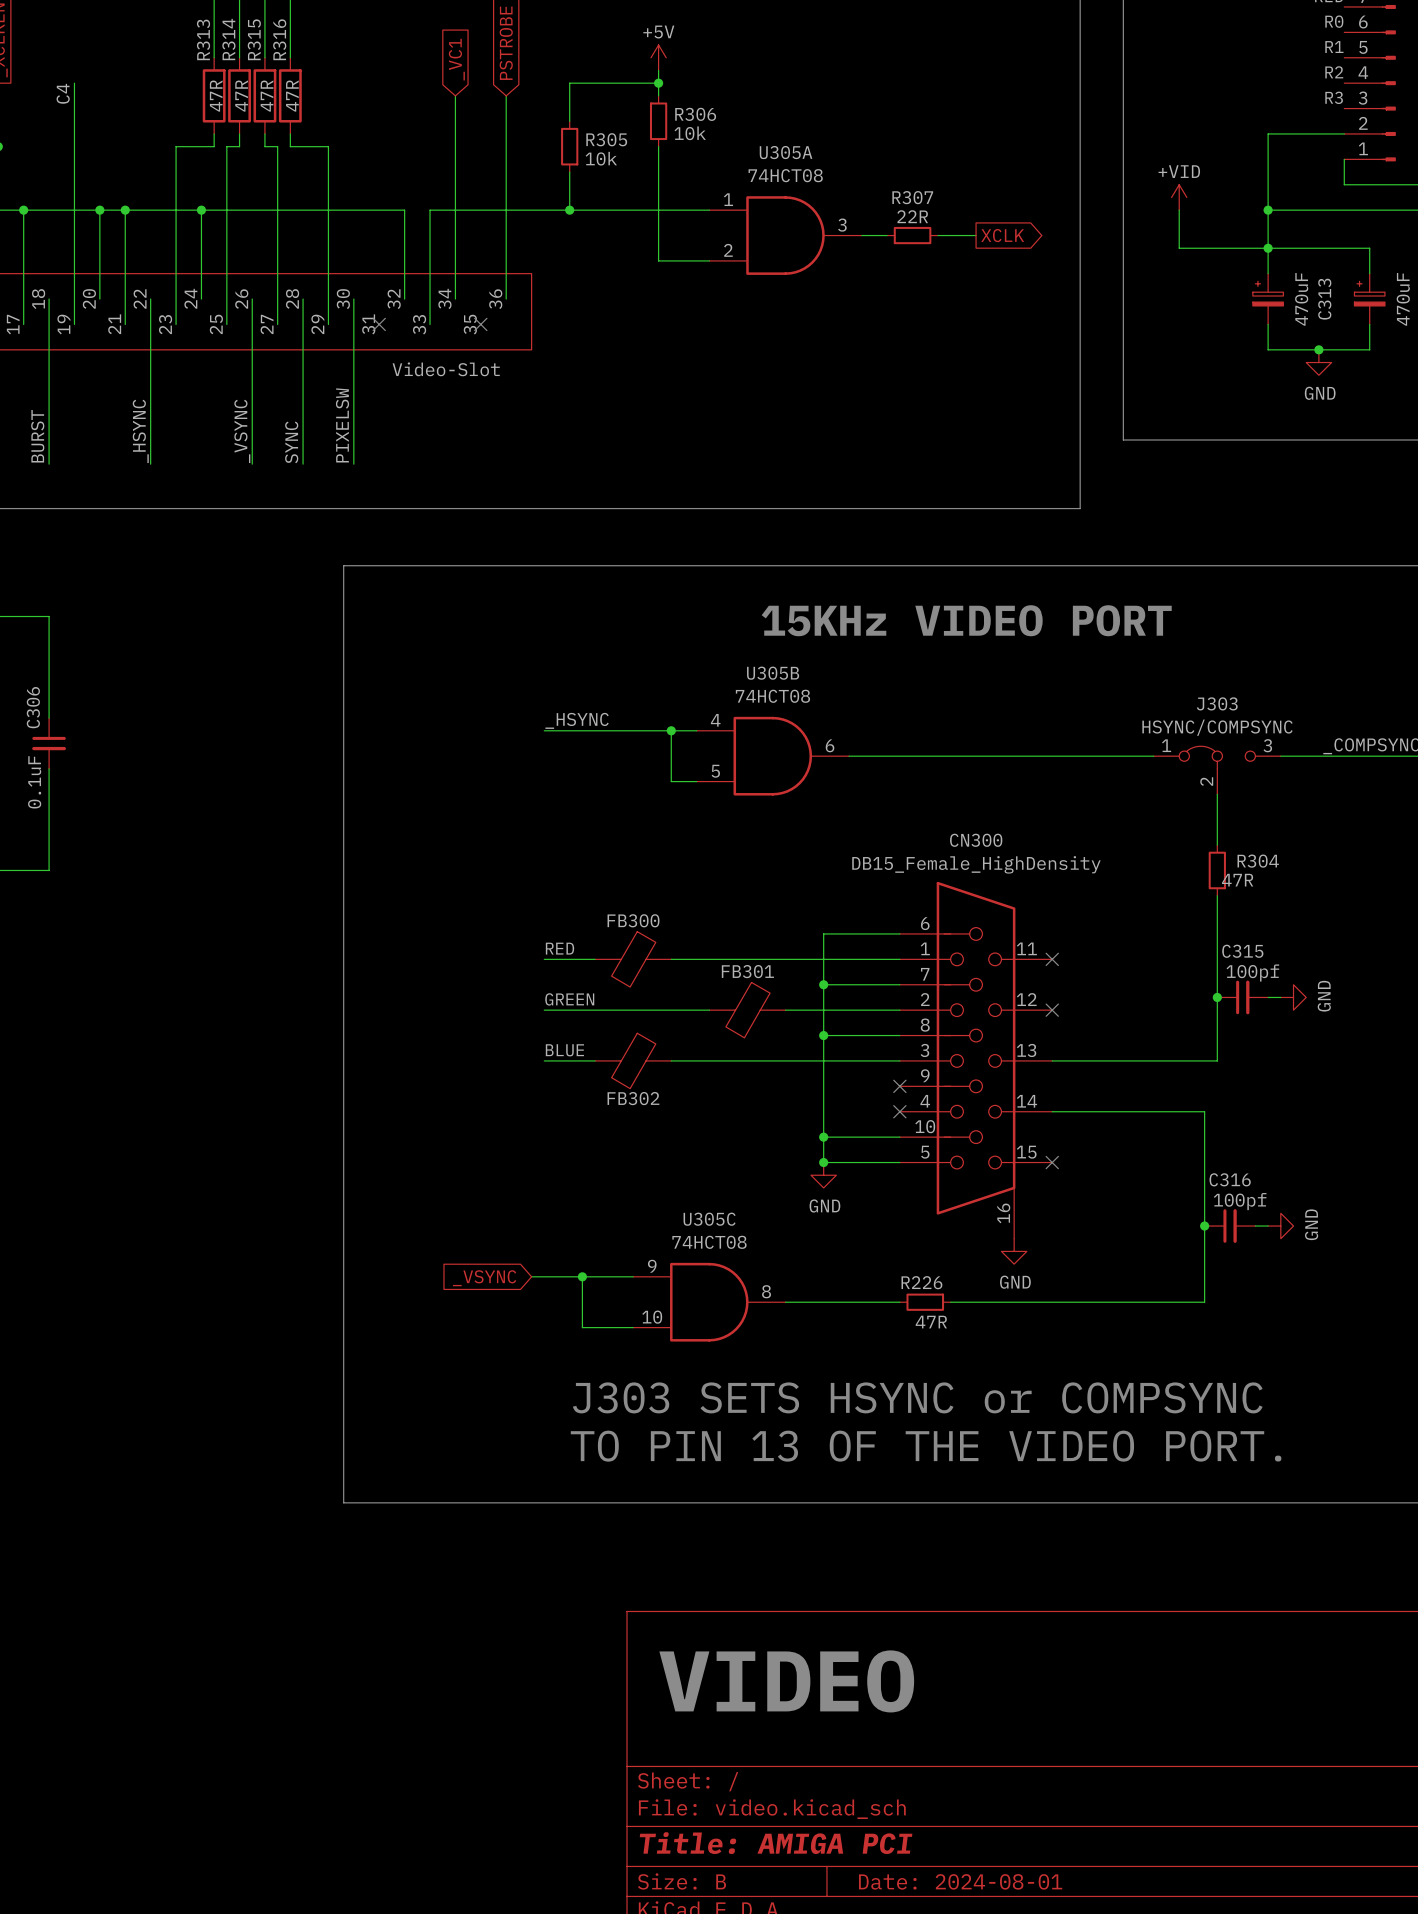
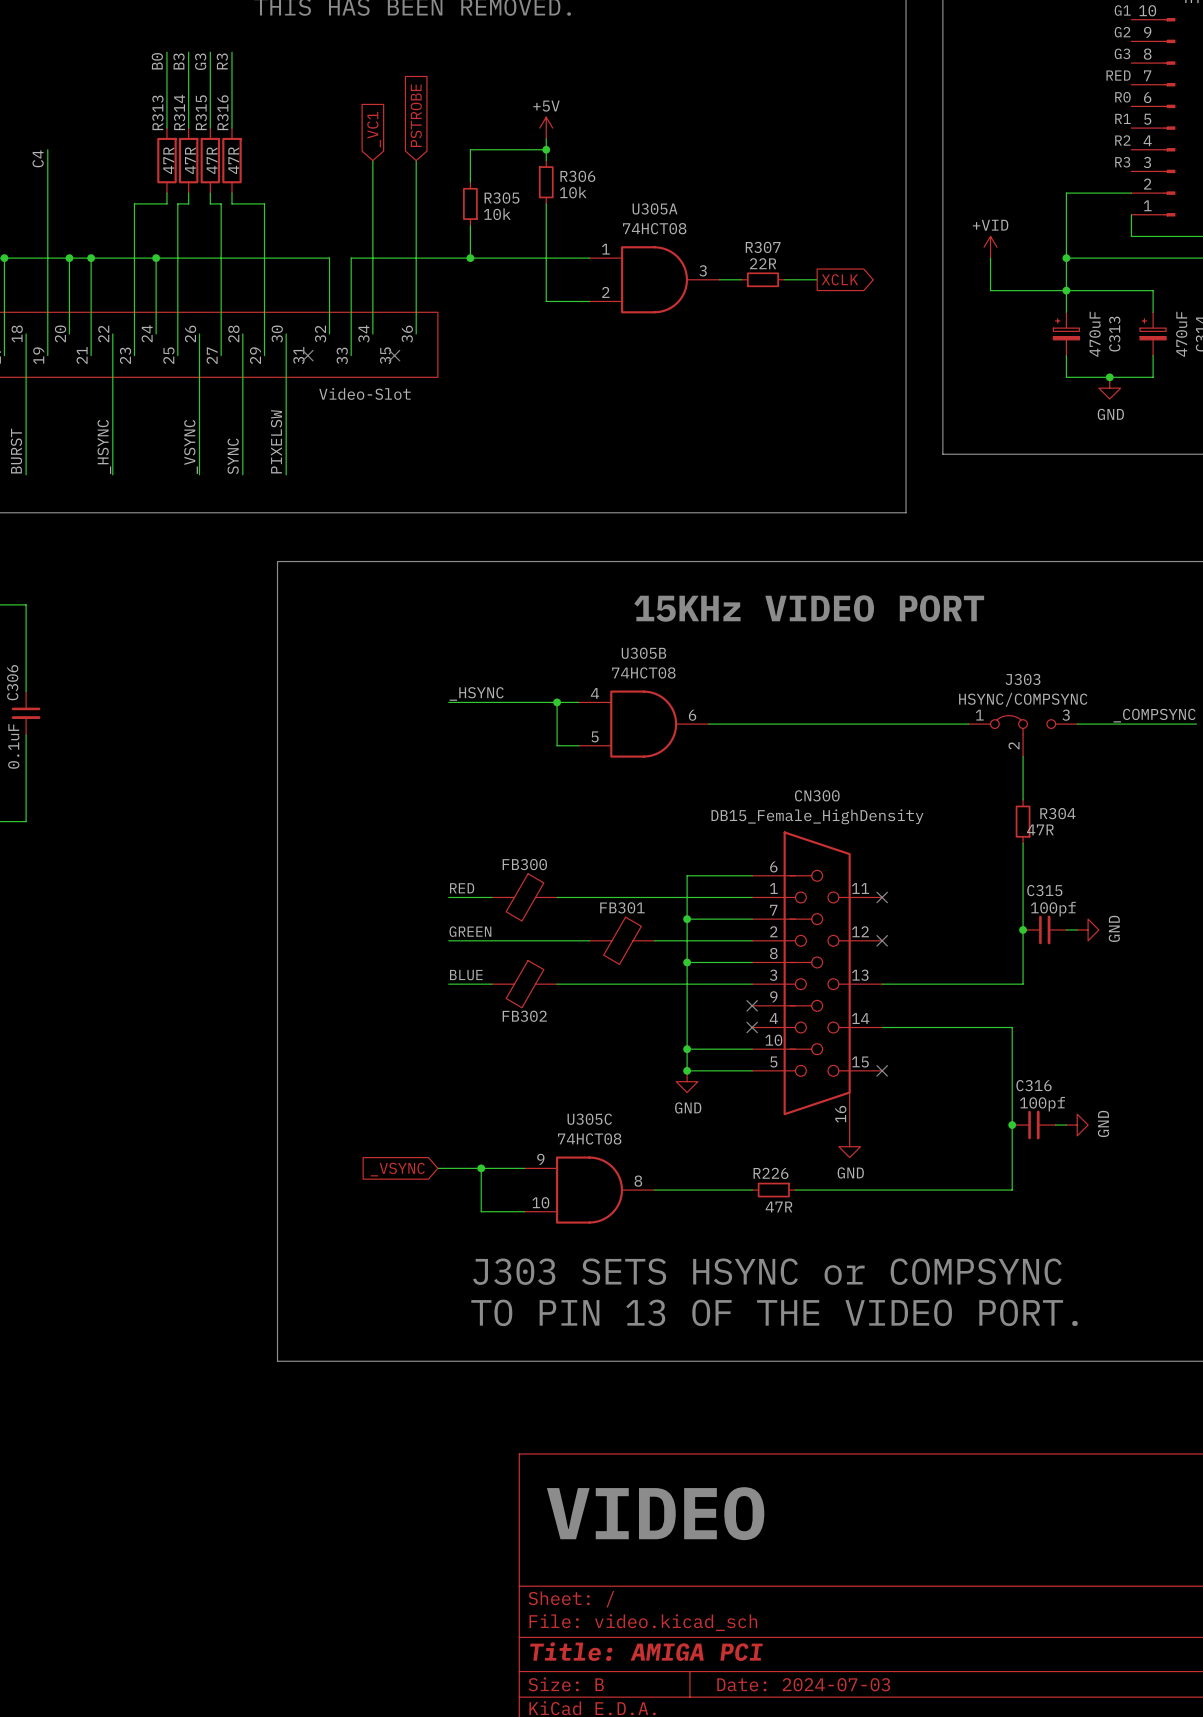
title block: Date: 2024-08-01 (960, 1881) -> Date: 2024-07-03 (803, 1684)

